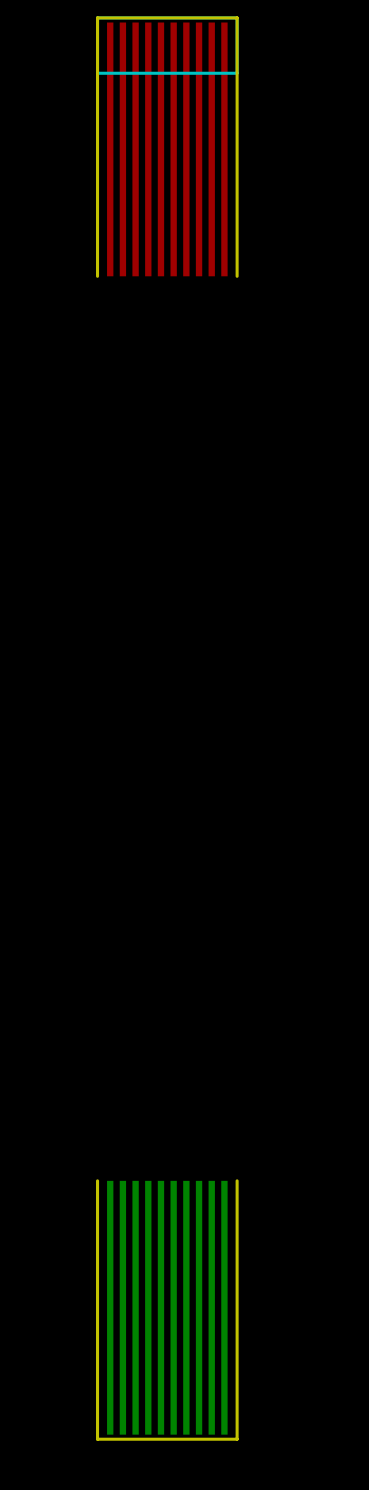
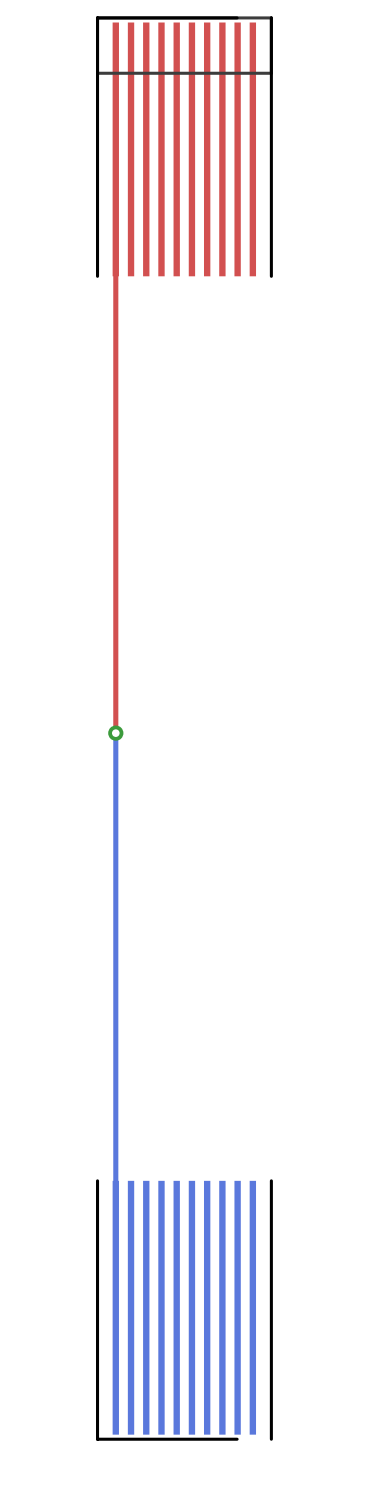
part footprint: [96, 16, 239, 278] -> [96, 16, 273, 278]
top track: none -> (115, 250) (115, 733)
bottom track: none -> (115, 733) (115, 1206)
via: none -> (115, 733)
part footprint: [96, 1179, 239, 1441] -> [96, 1179, 273, 1441]

